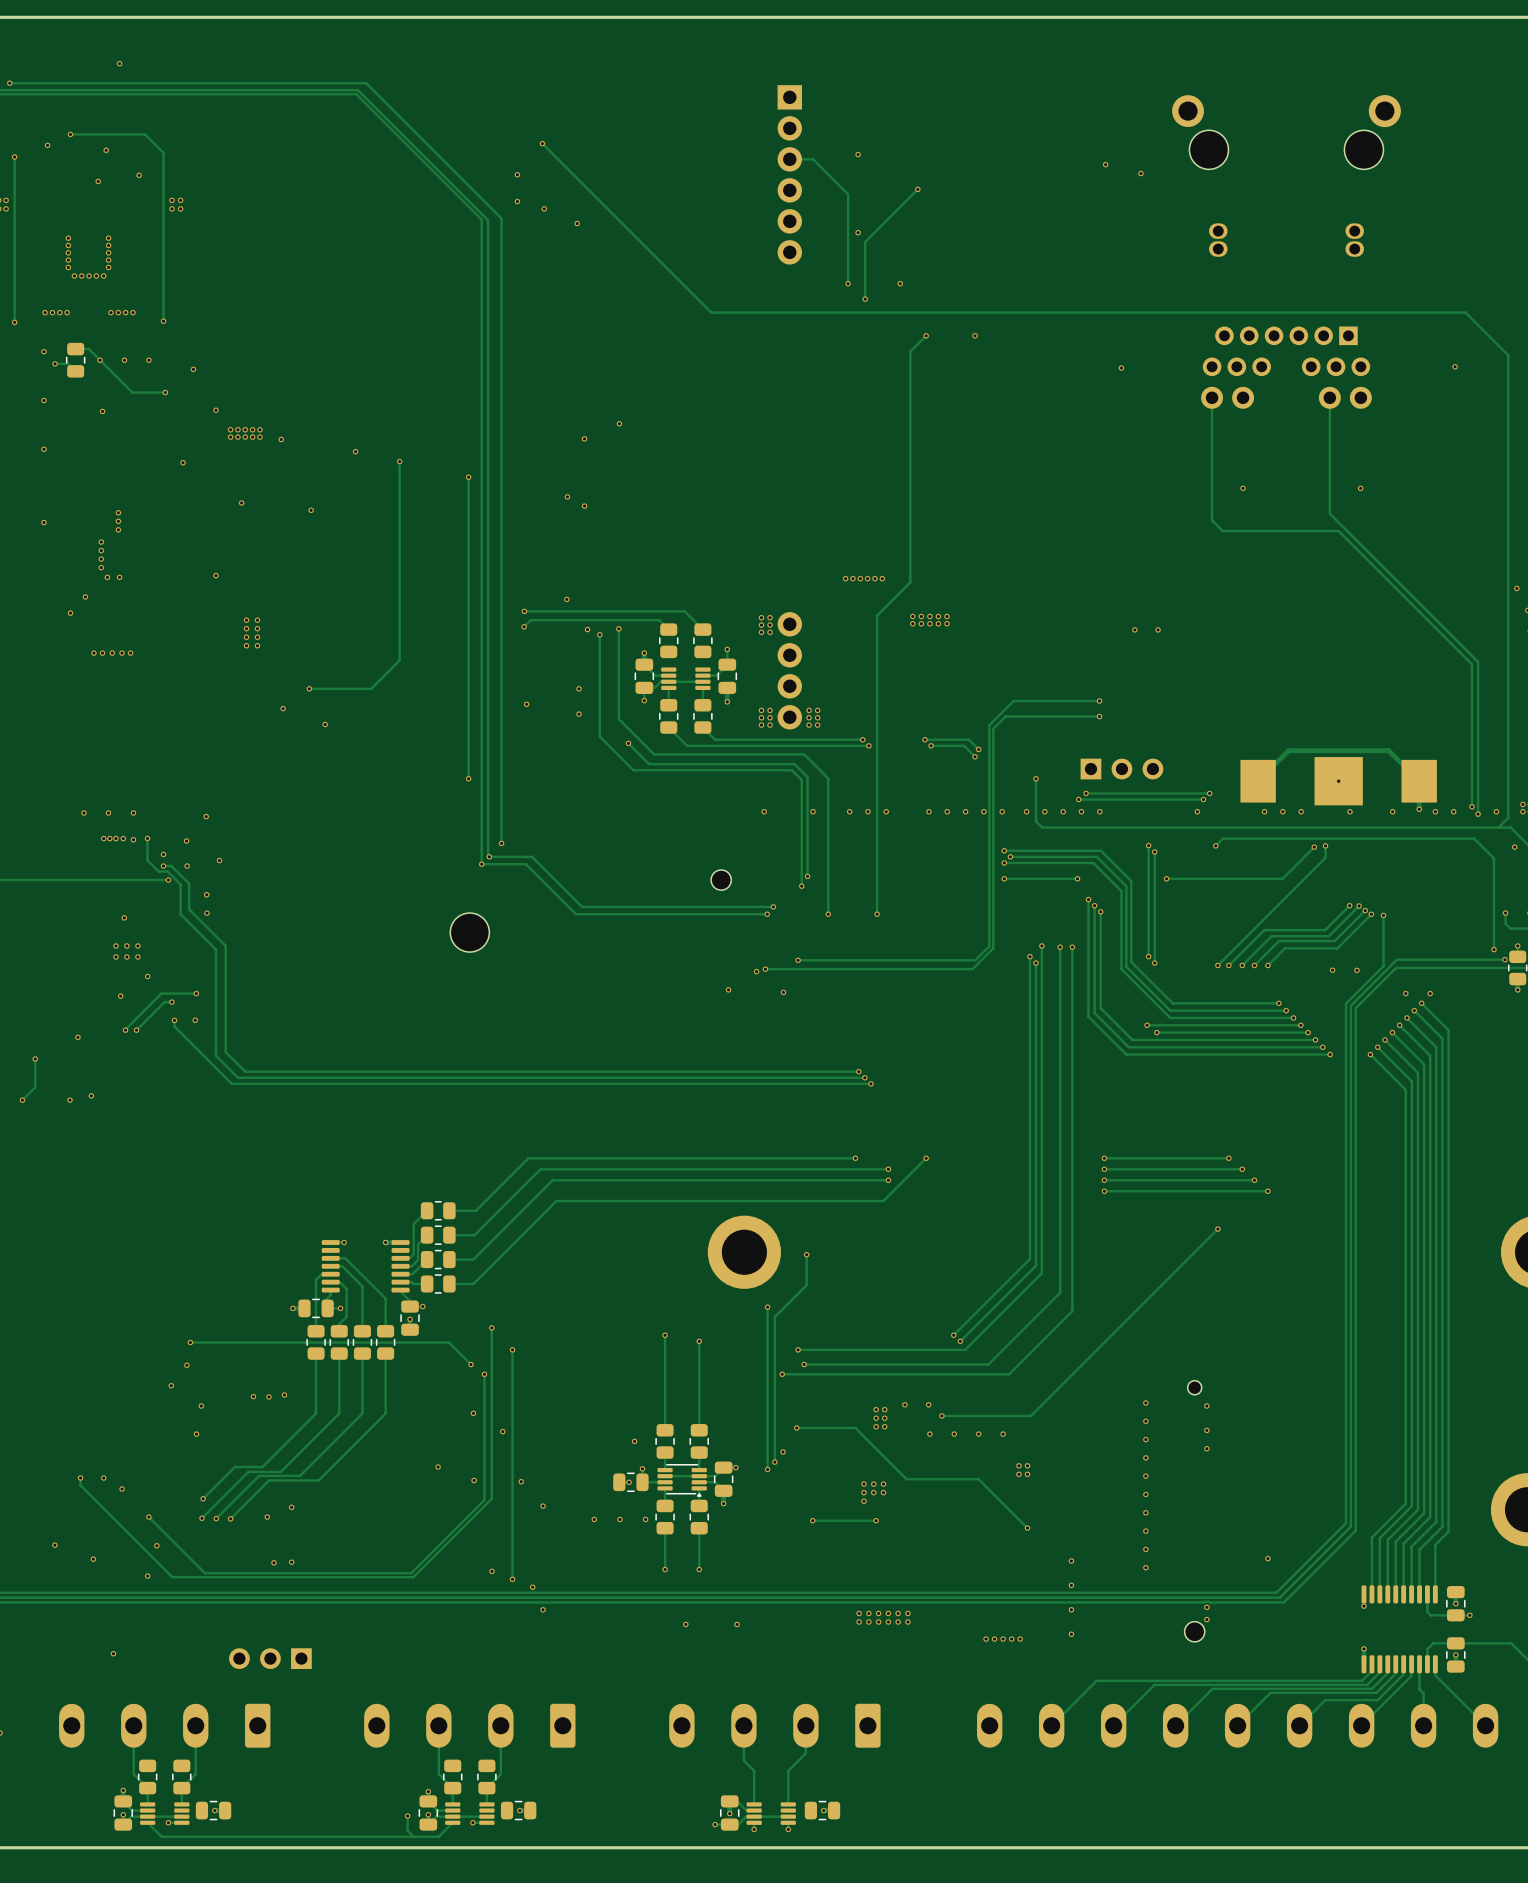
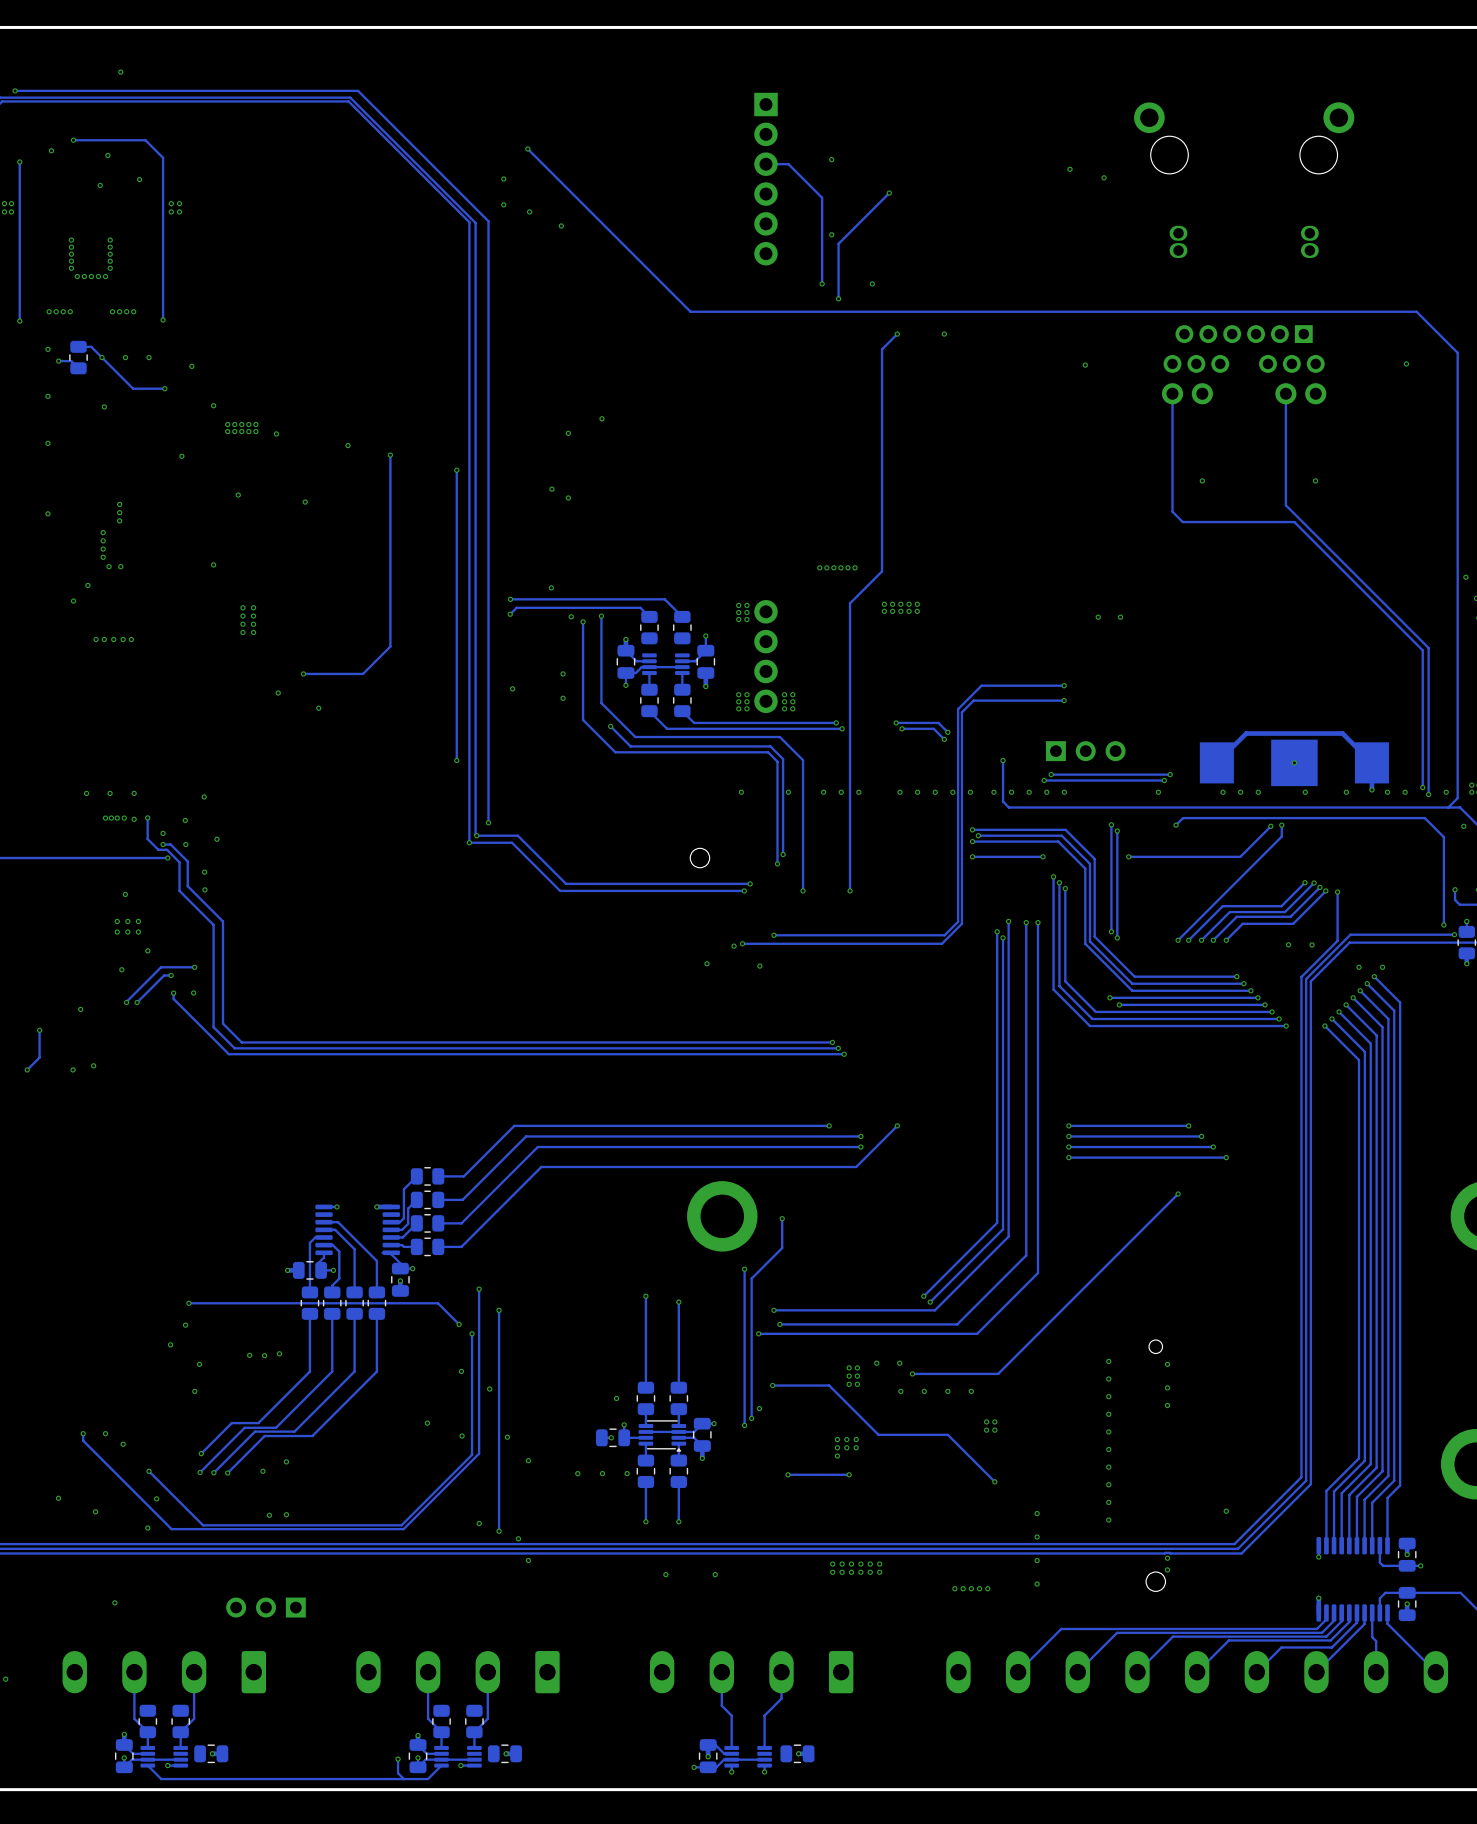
part: (469, 932) -> none

